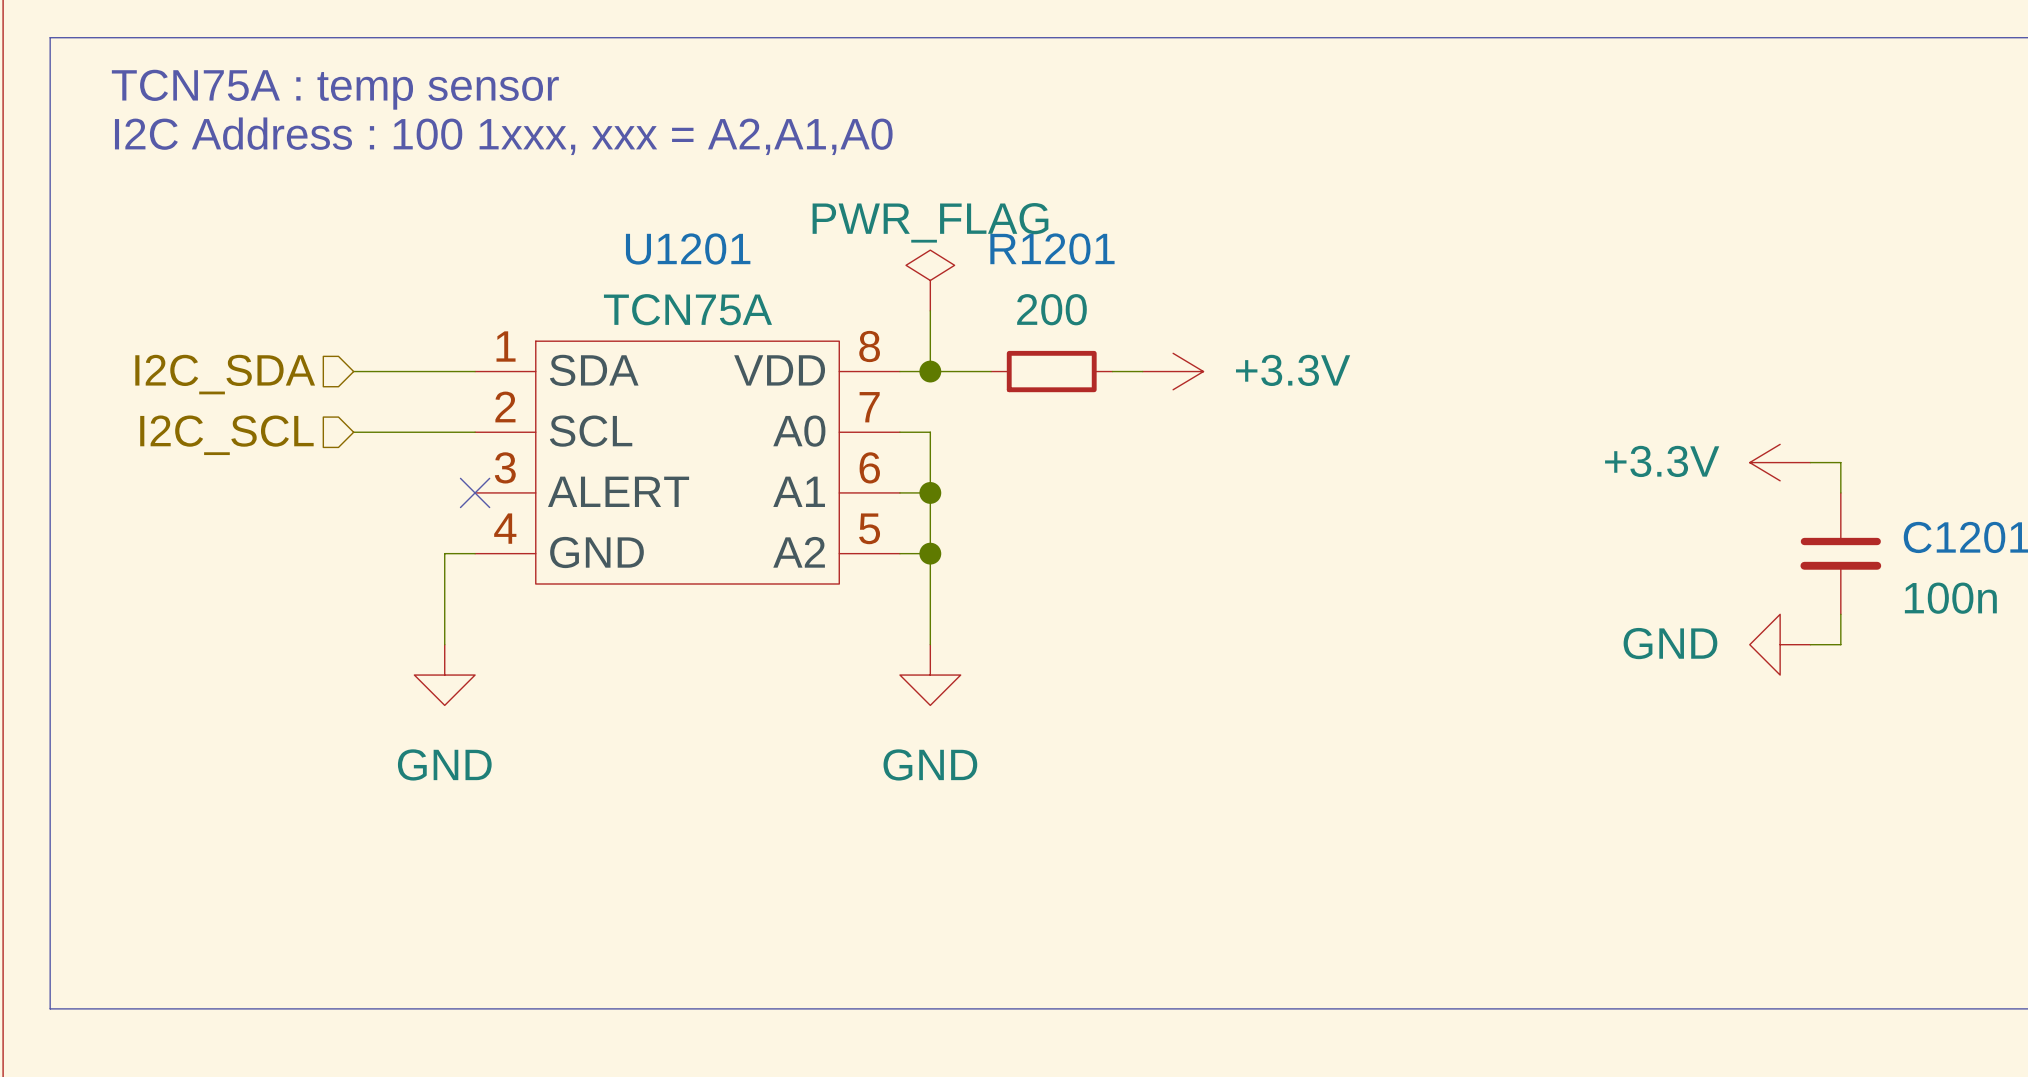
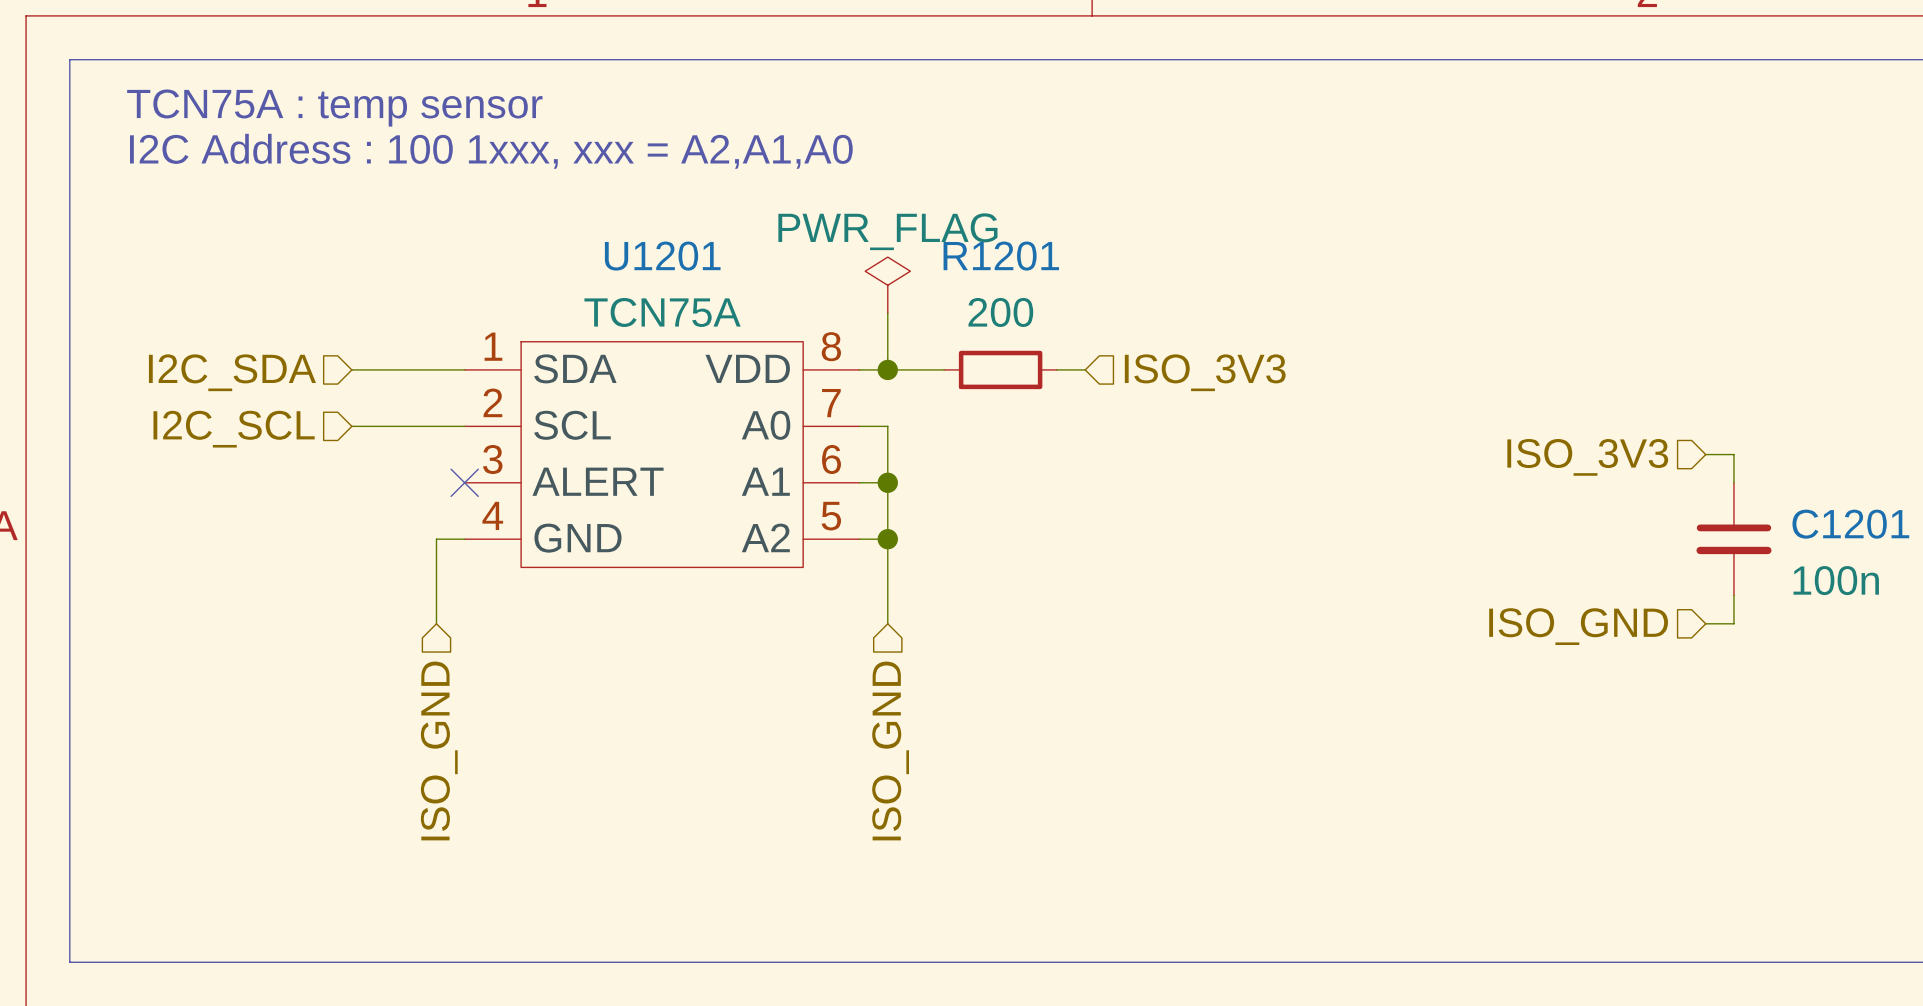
power symbol: +3.3V (1173, 371) -> none
hierarchical label: none -> ISO_3V3 (1205, 372)
power symbol: +3.3V (1780, 462) -> none
hierarchical label: none -> ISO_3V3 (1587, 457)
power symbol: GND (1780, 644) -> none
hierarchical label: none -> ISO_GND (1578, 626)
power symbol: GND (444, 675) -> none
power symbol: GND (930, 675) -> none
hierarchical label: none -> ISO_GND (439, 750)
hierarchical label: none -> ISO_GND (890, 750)

